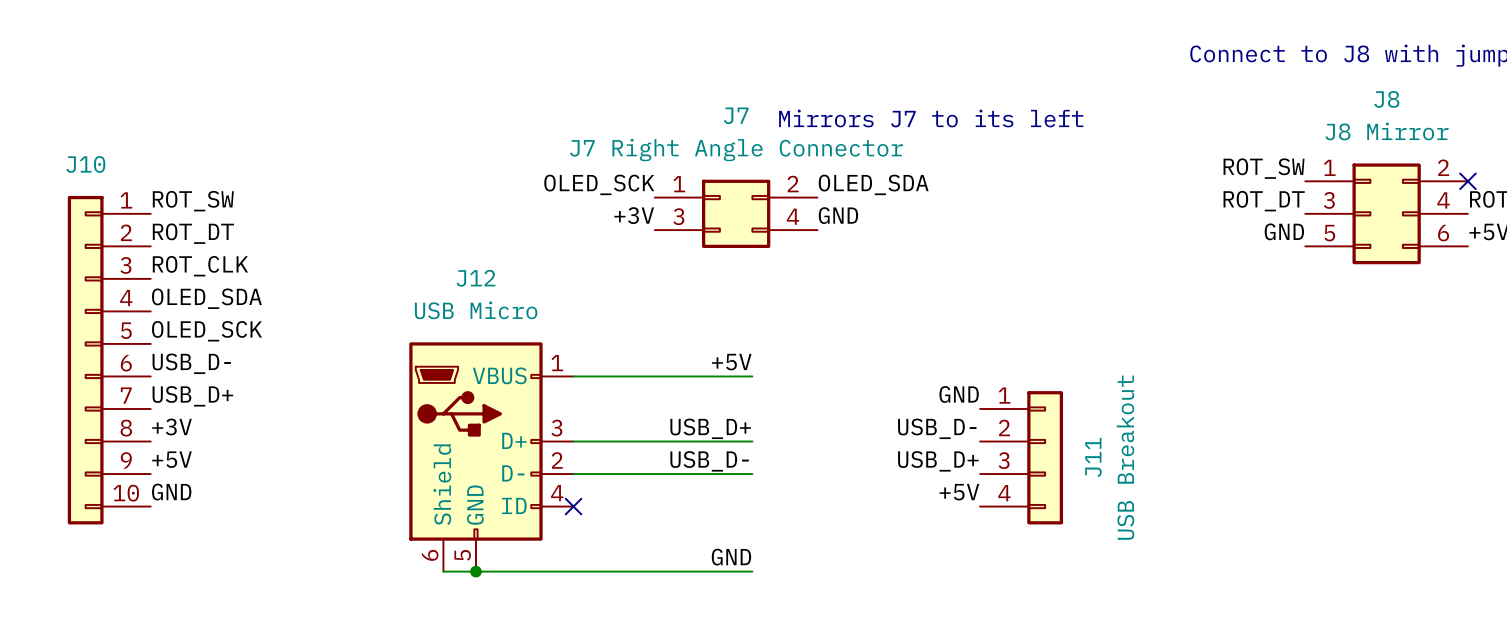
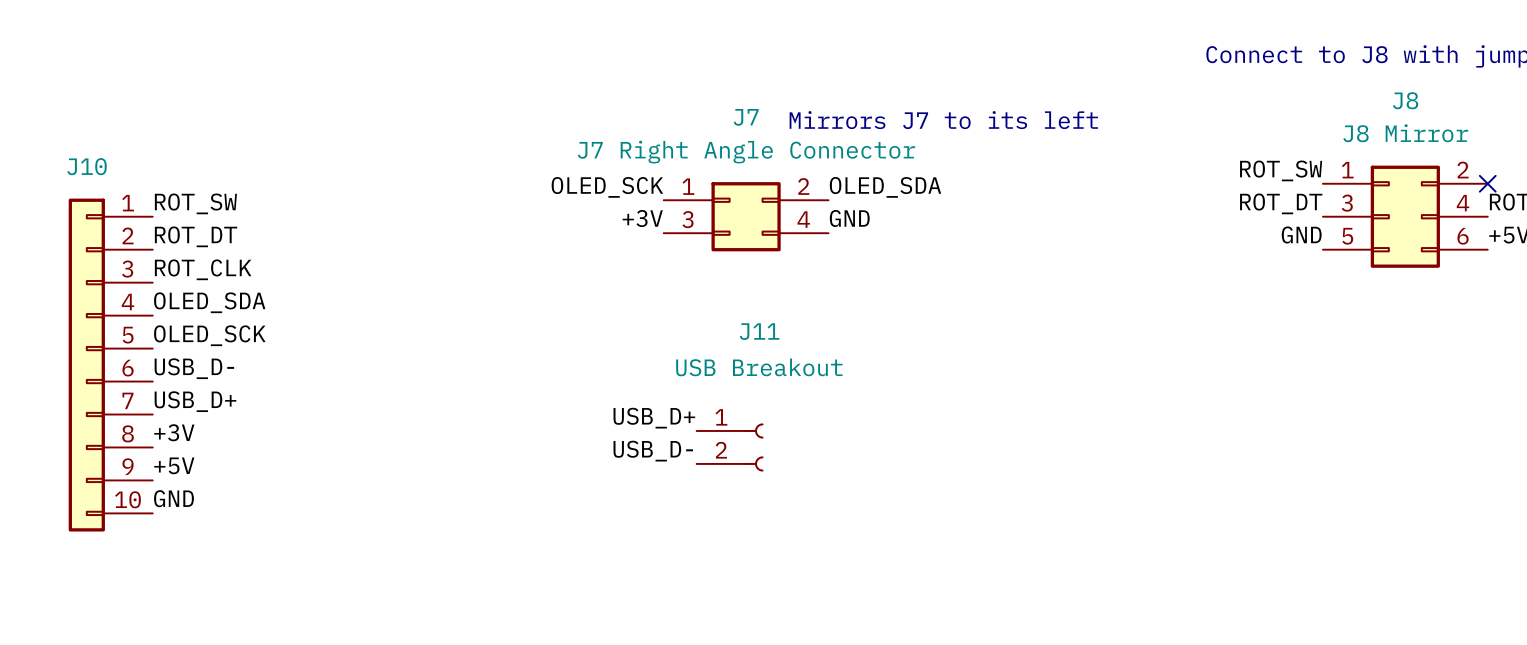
label: +5V (731, 362) -> none
wire: (573, 376) (752, 376) -> none
J11 symbol: [980, 391, 1064, 525] -> [696, 423, 764, 472]
label: GND (959, 394) -> none
label position: USB_D+ (710, 428) -> USB_D+ (654, 418)
label: USB_D- (937, 428) -> none
wire: (573, 441) (752, 441) -> none
J12: USB Micro (491, 456) -> none
J11 name position: J11 (1093, 457) -> J11 (759, 331)
J11 value position: USB Breakout (1125, 457) -> USB Breakout (759, 367)
label position: USB_D- (709, 461) -> USB_D- (653, 451)
label: USB_D+ (938, 461) -> none
wire: (573, 474) (752, 474) -> none
label: +5V (959, 492) -> none
no-connect mark: (573, 506) -> none
label: GND (731, 557) -> none
wire: (443, 571) (752, 571) -> none
junction: (475, 571) -> none

